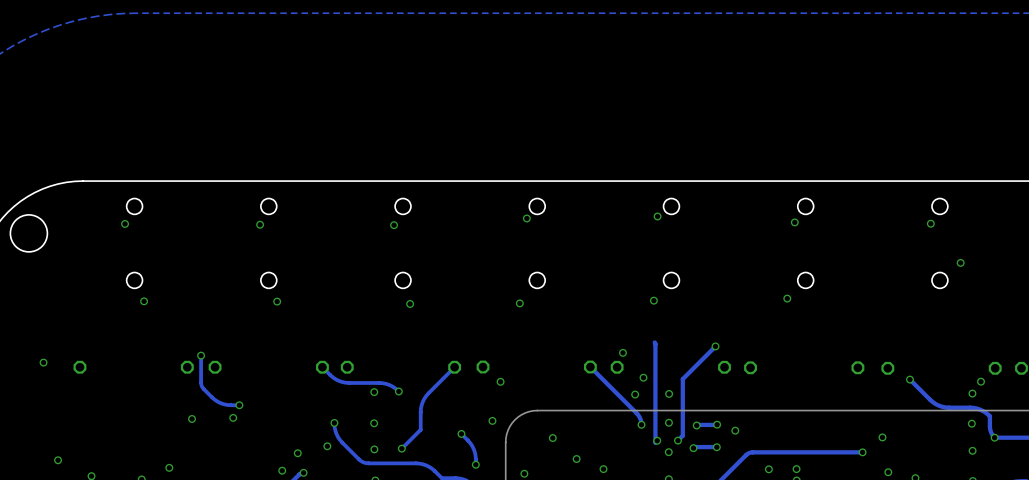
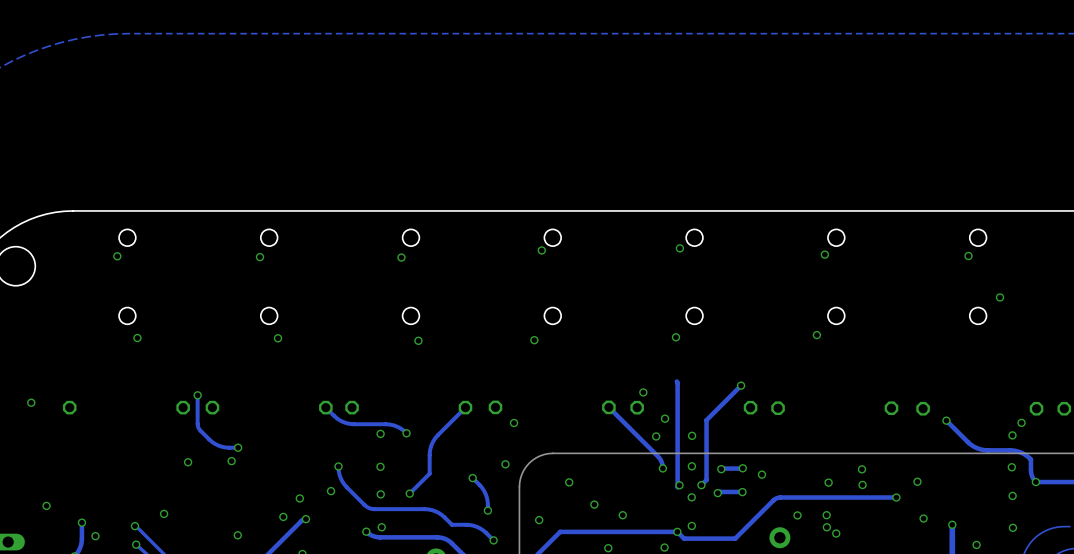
via: none -> (861, 469)
via: none -> (828, 482)
via: none -> (862, 484)

